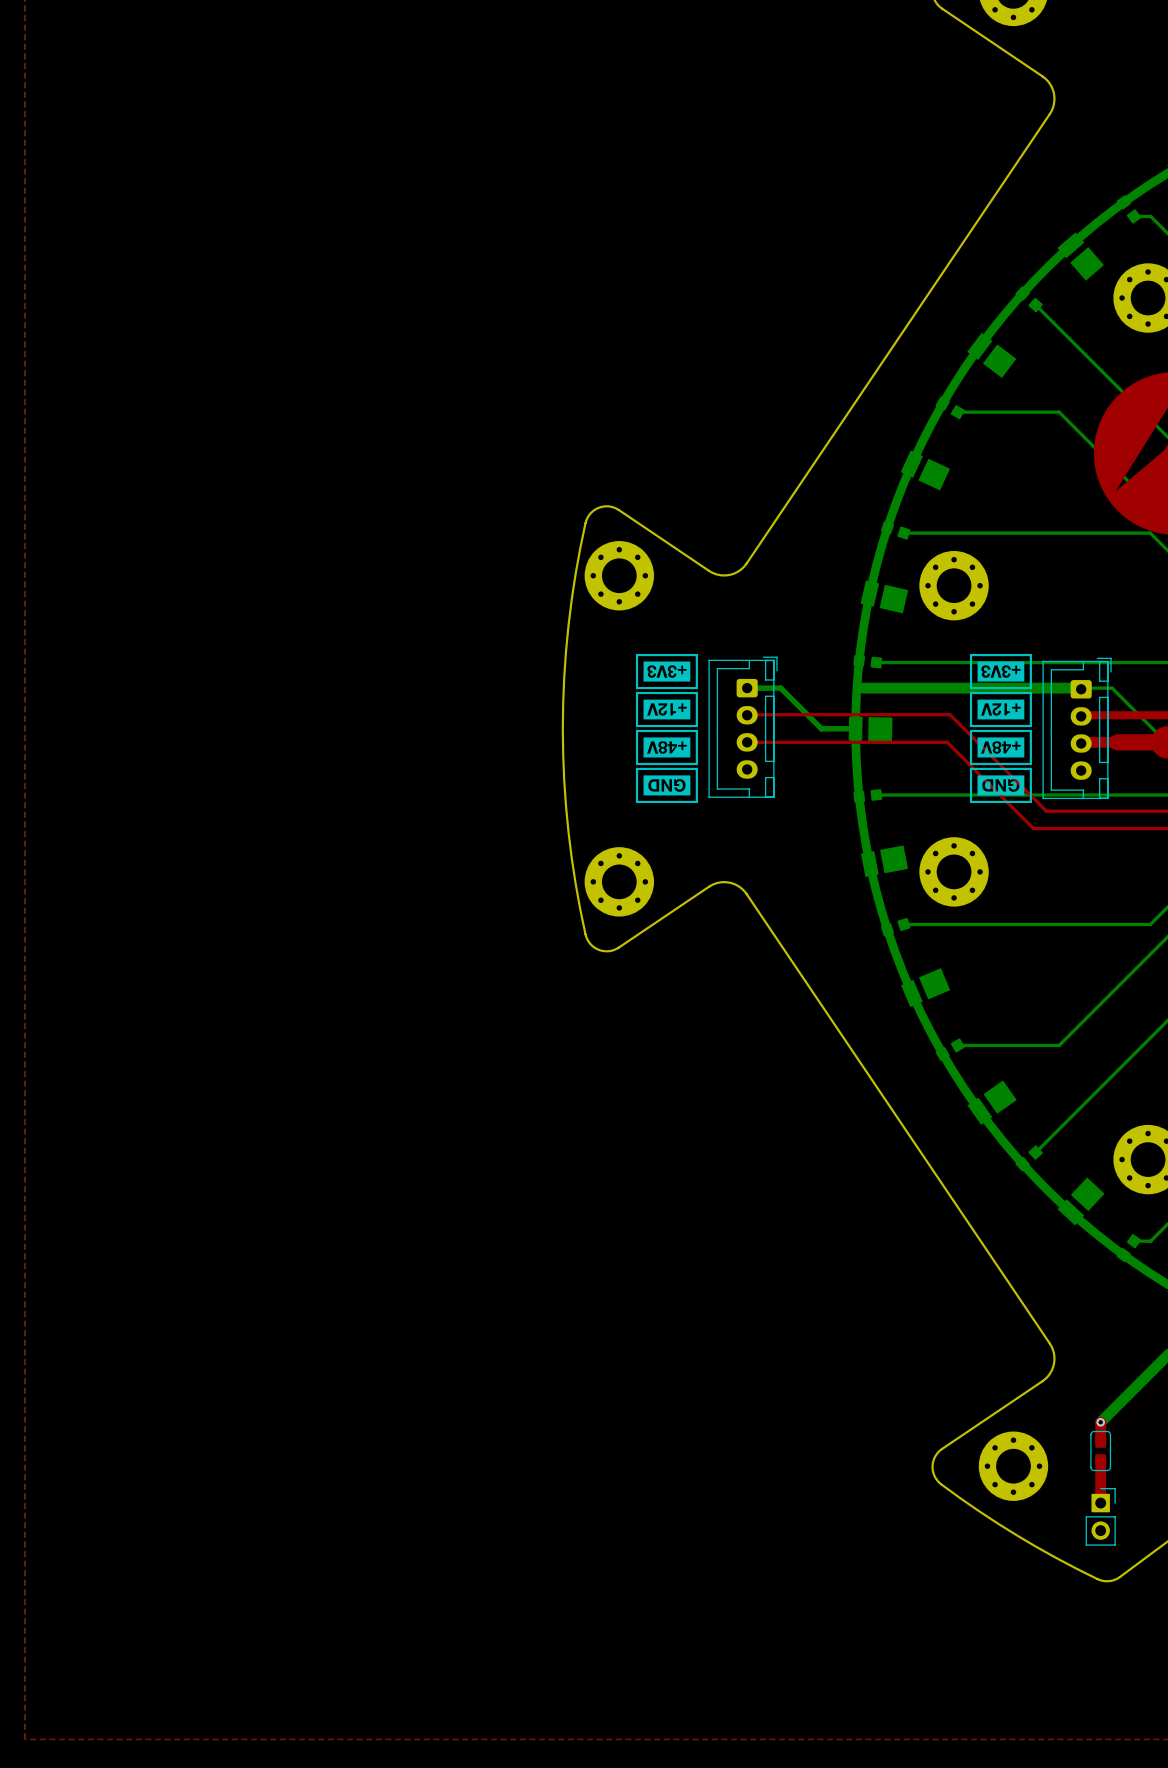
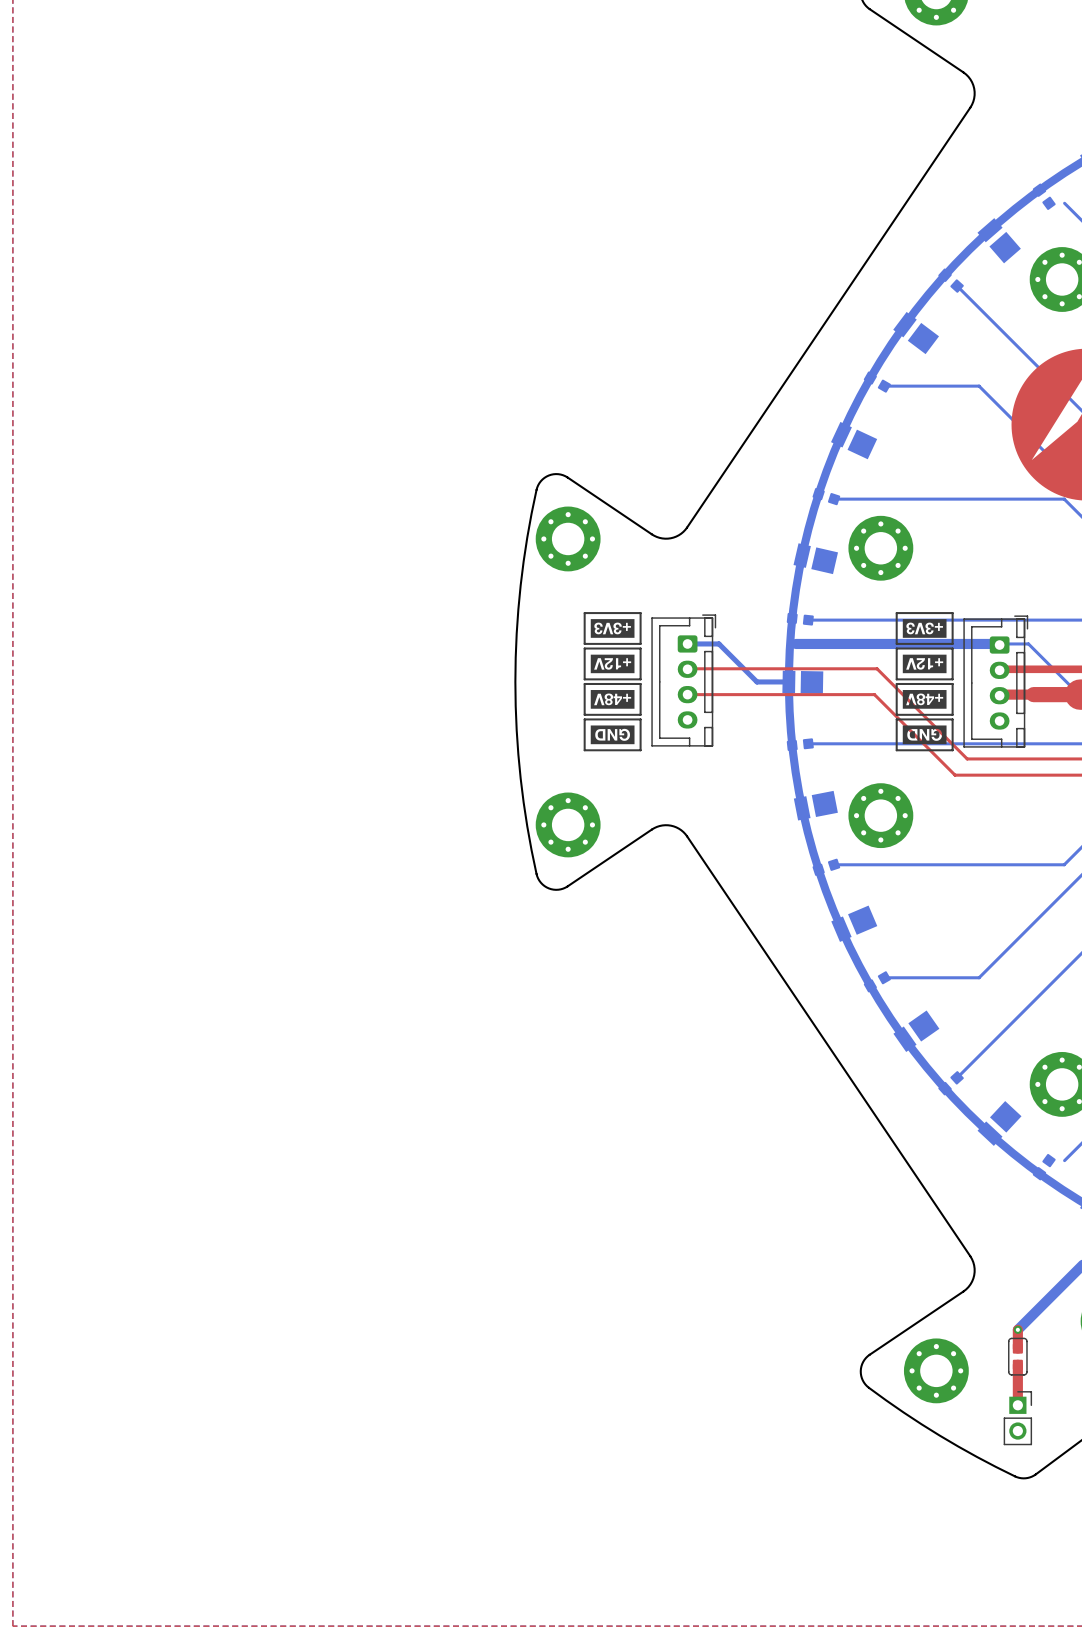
bottom track: (1134, 216) (1150, 216) -> none
bottom track: (1134, 1241) (1150, 1241) -> none

